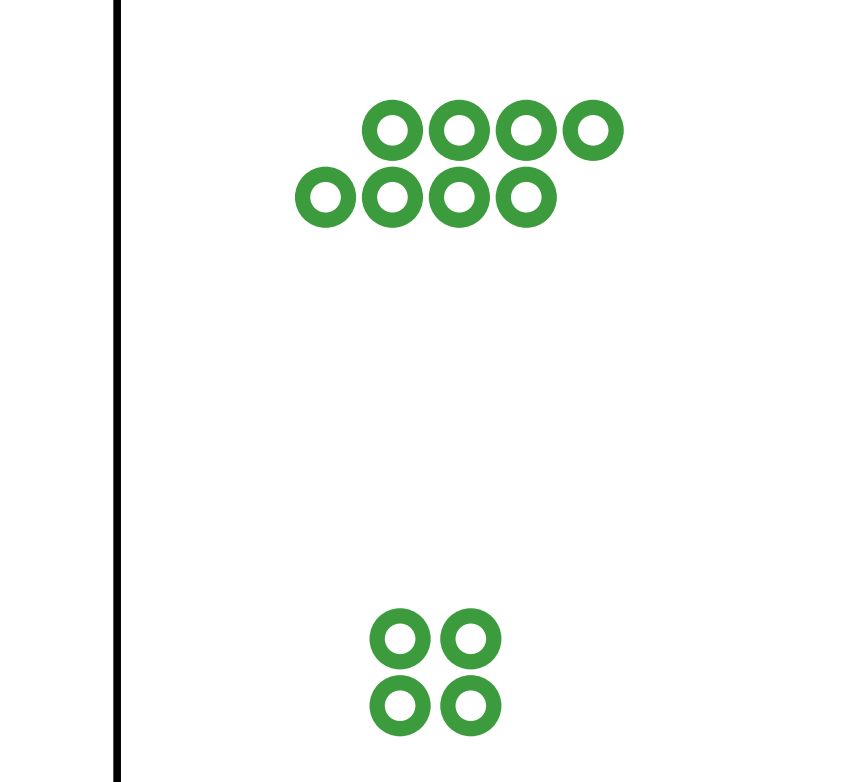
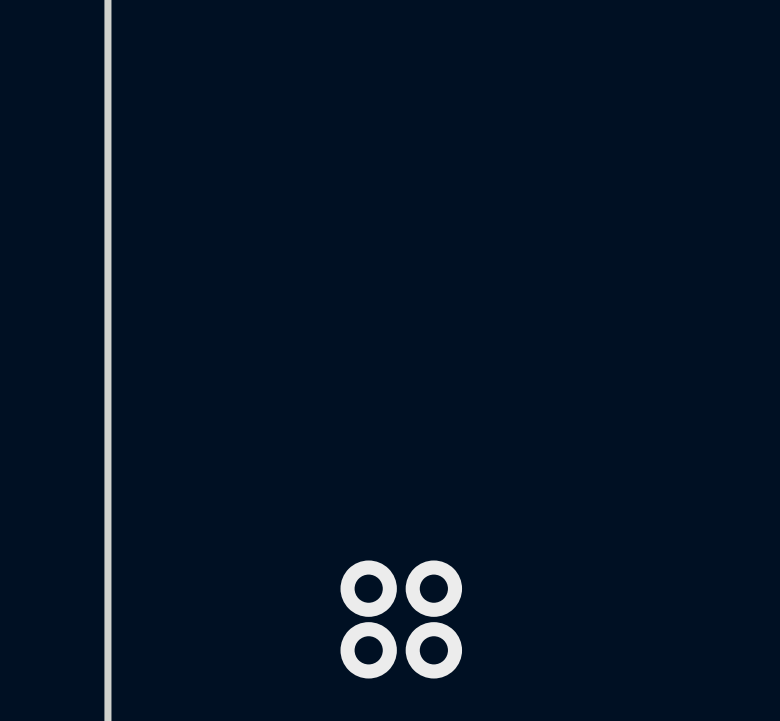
via: (392, 130) -> none
via: (459, 130) -> none
via: (526, 130) -> none
via: (593, 130) -> none
via: (325, 197) -> none
via: (392, 197) -> none
via: (459, 197) -> none
via: (526, 197) -> none

